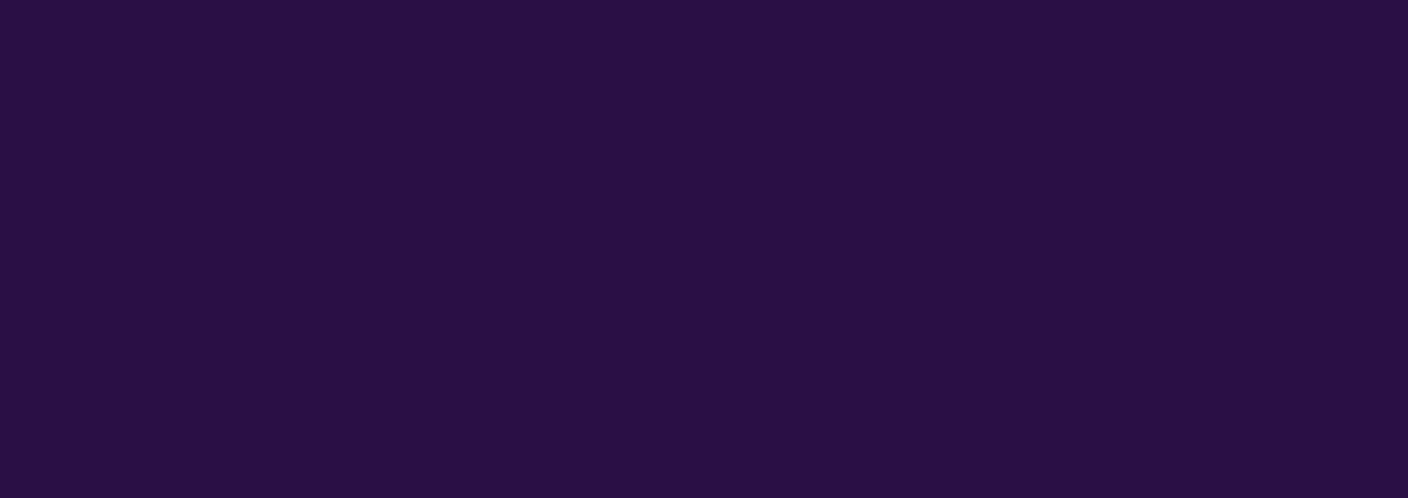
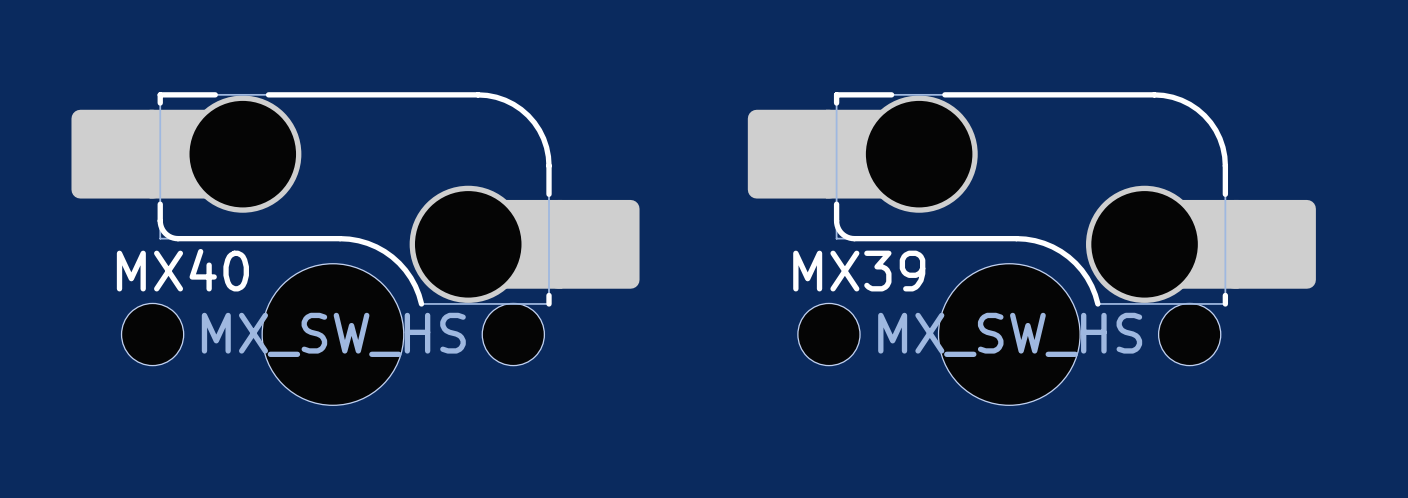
MX40: none -> MX_SW_HS (355, 248)
MX39: none -> MX_SW_HS (1031, 248)

